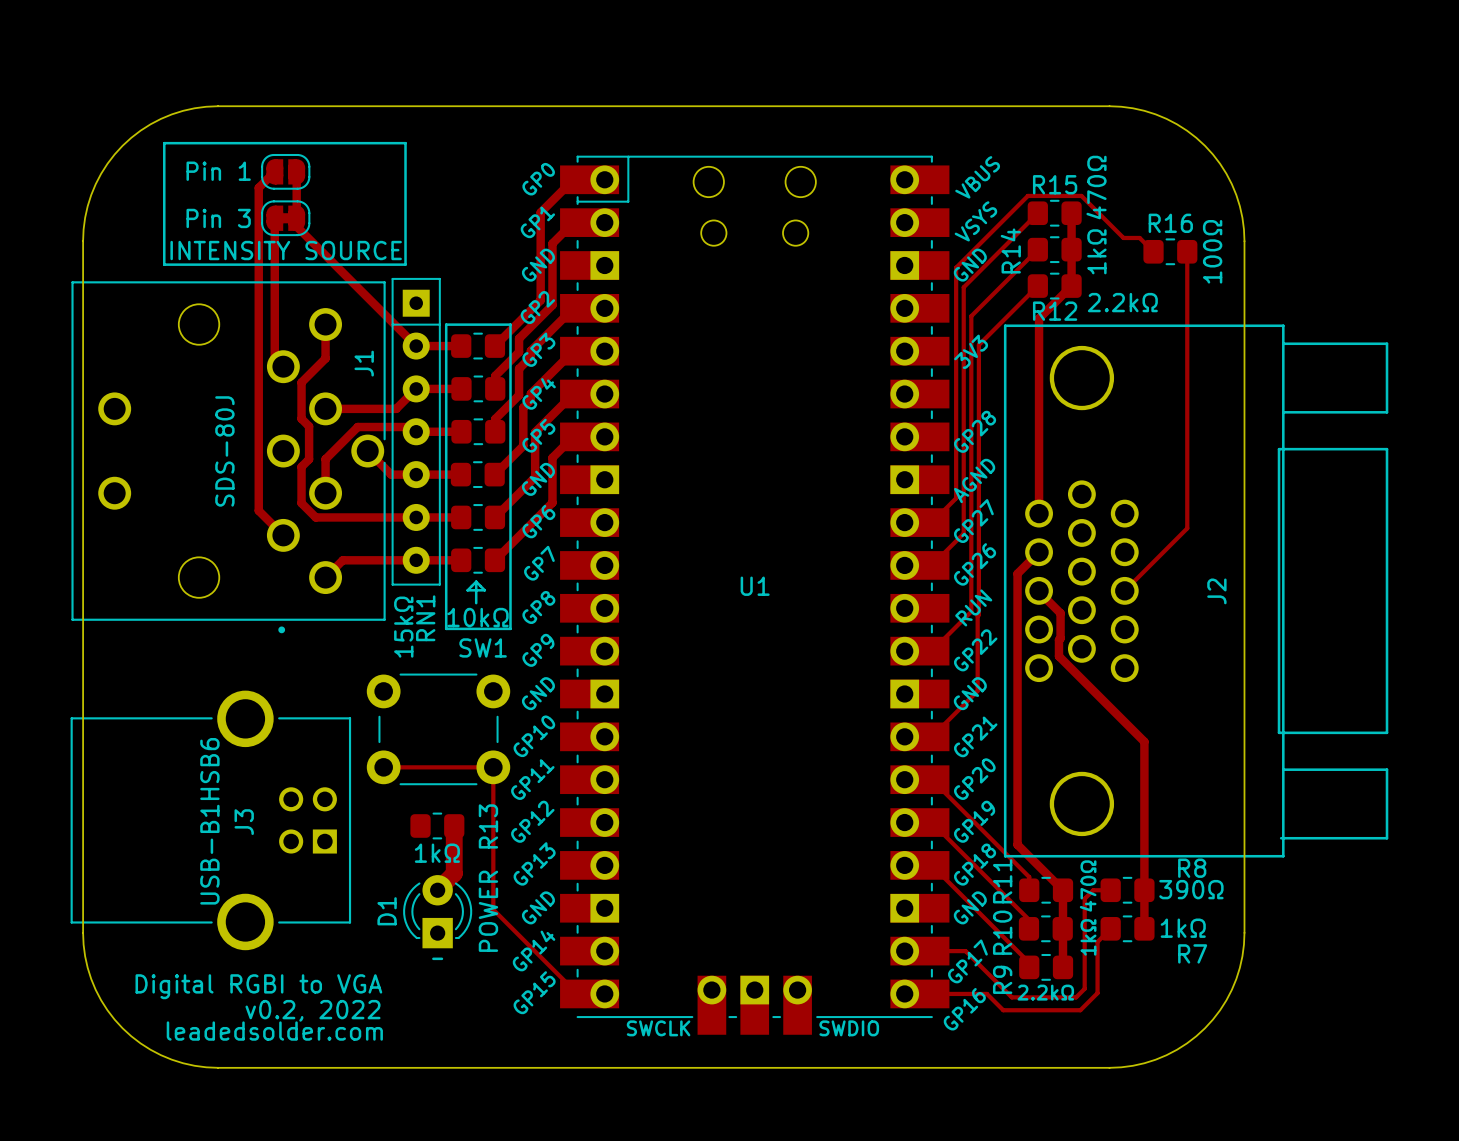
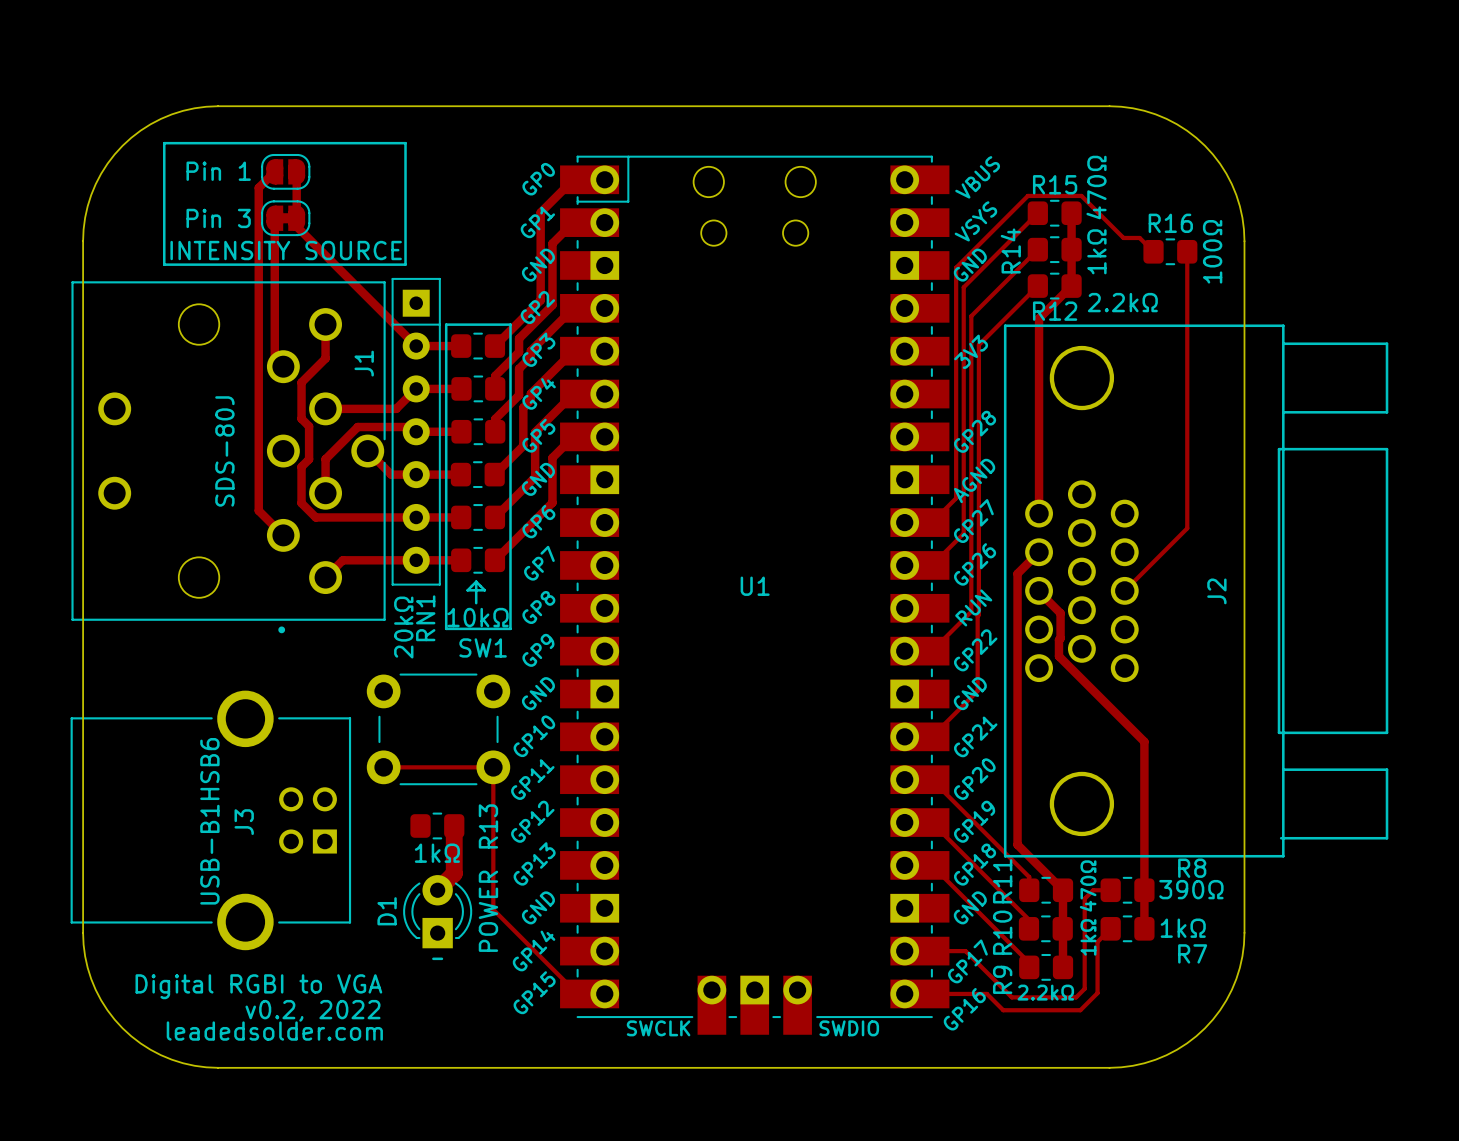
RN1 value: 15kΩ (403, 627) -> 20kΩ (403, 627)

